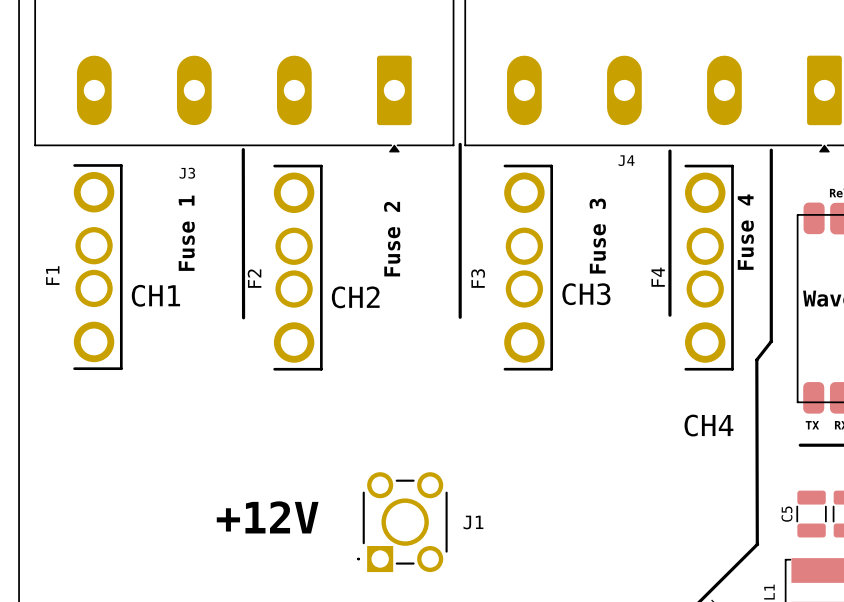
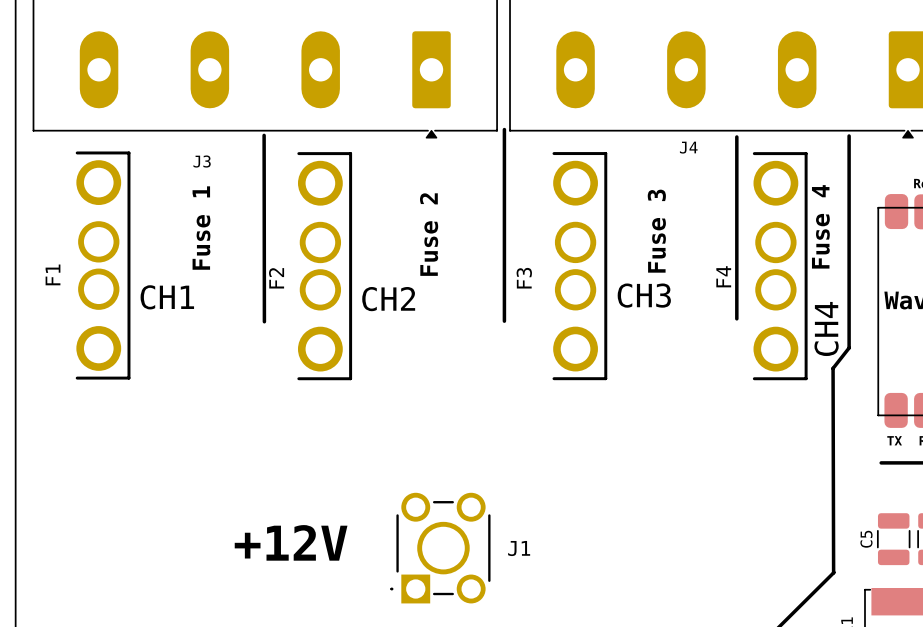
text rotation: 0° (708, 425) -> 90° counterclockwise (826, 328)
text position: CH4 (708, 425) -> CH4 (826, 328)

